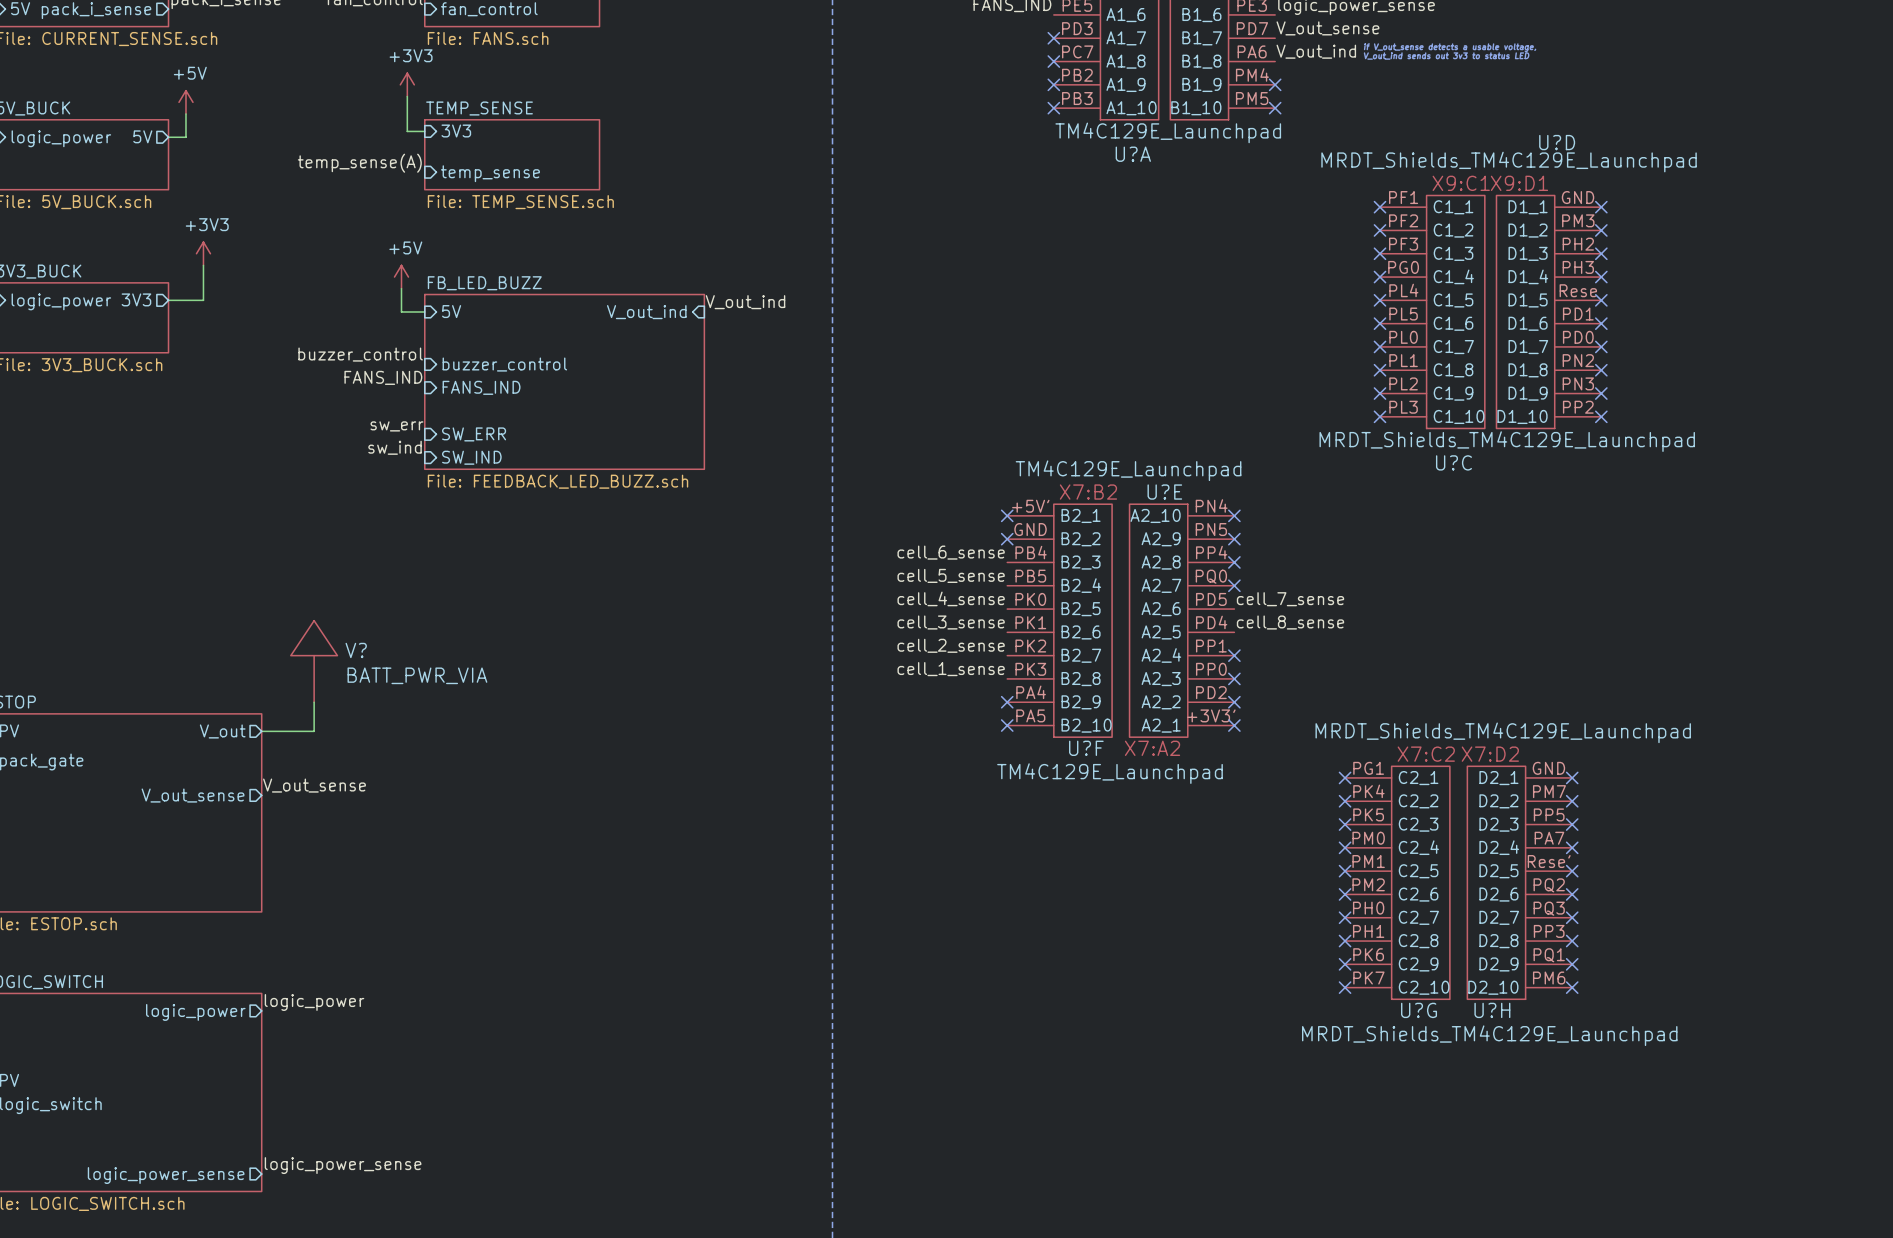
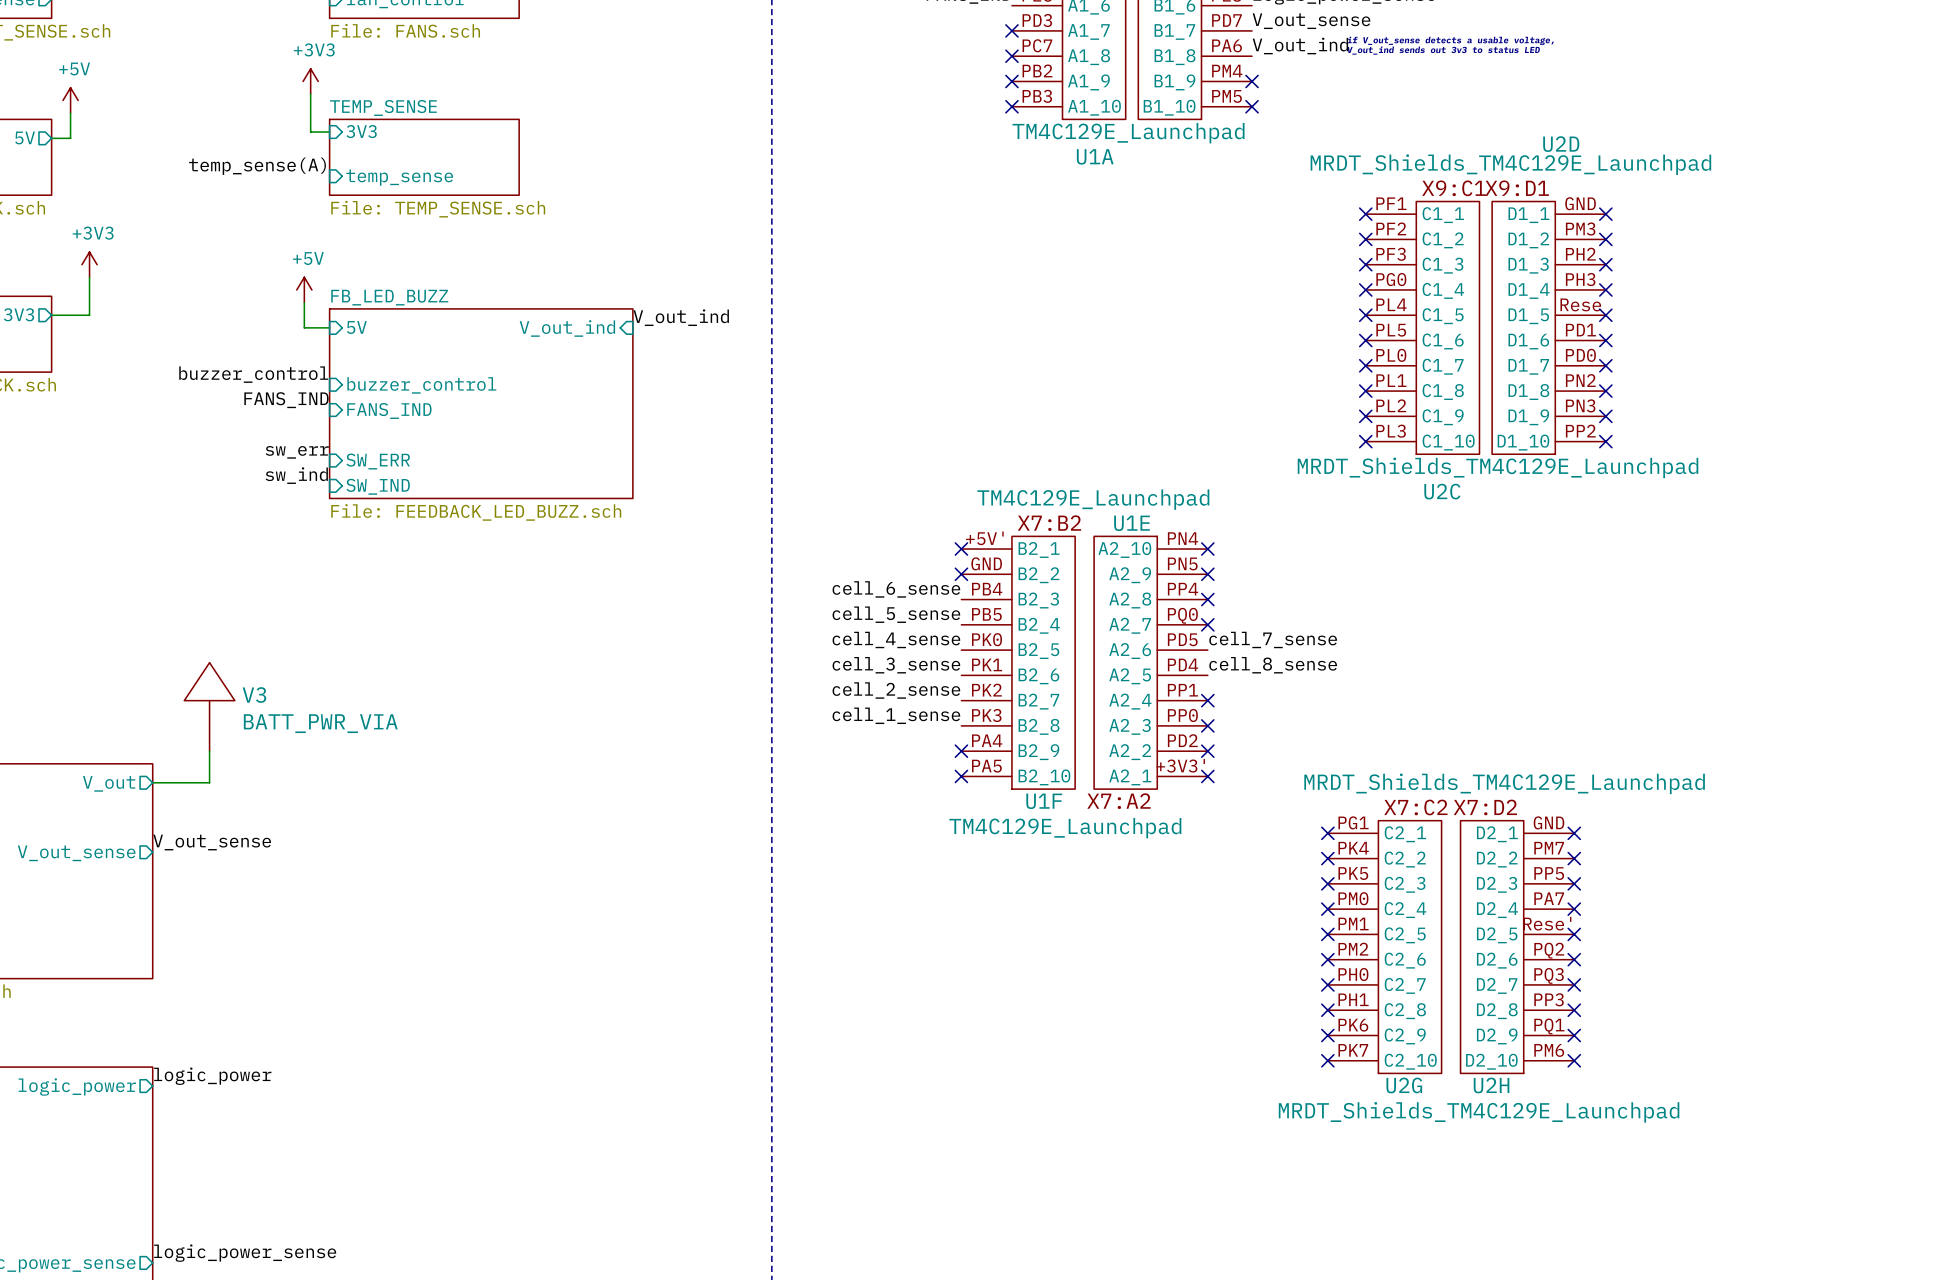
U?D name: U?D (1557, 142) -> U2D (1561, 144)
U?A name: U?A (1133, 154) -> U1A (1095, 156)
U?C name: U?C (1453, 462) -> U2C (1442, 491)
U?E name: U?E (1164, 492) -> U1E (1131, 523)
V? name: V? (356, 650) -> V3 (254, 695)
U?F name: U?F (1086, 748) -> U1F (1044, 801)
U?G name: U?G (1419, 1010) -> U2G (1404, 1085)
U?H name: U?H (1492, 1010) -> U2H (1491, 1085)

